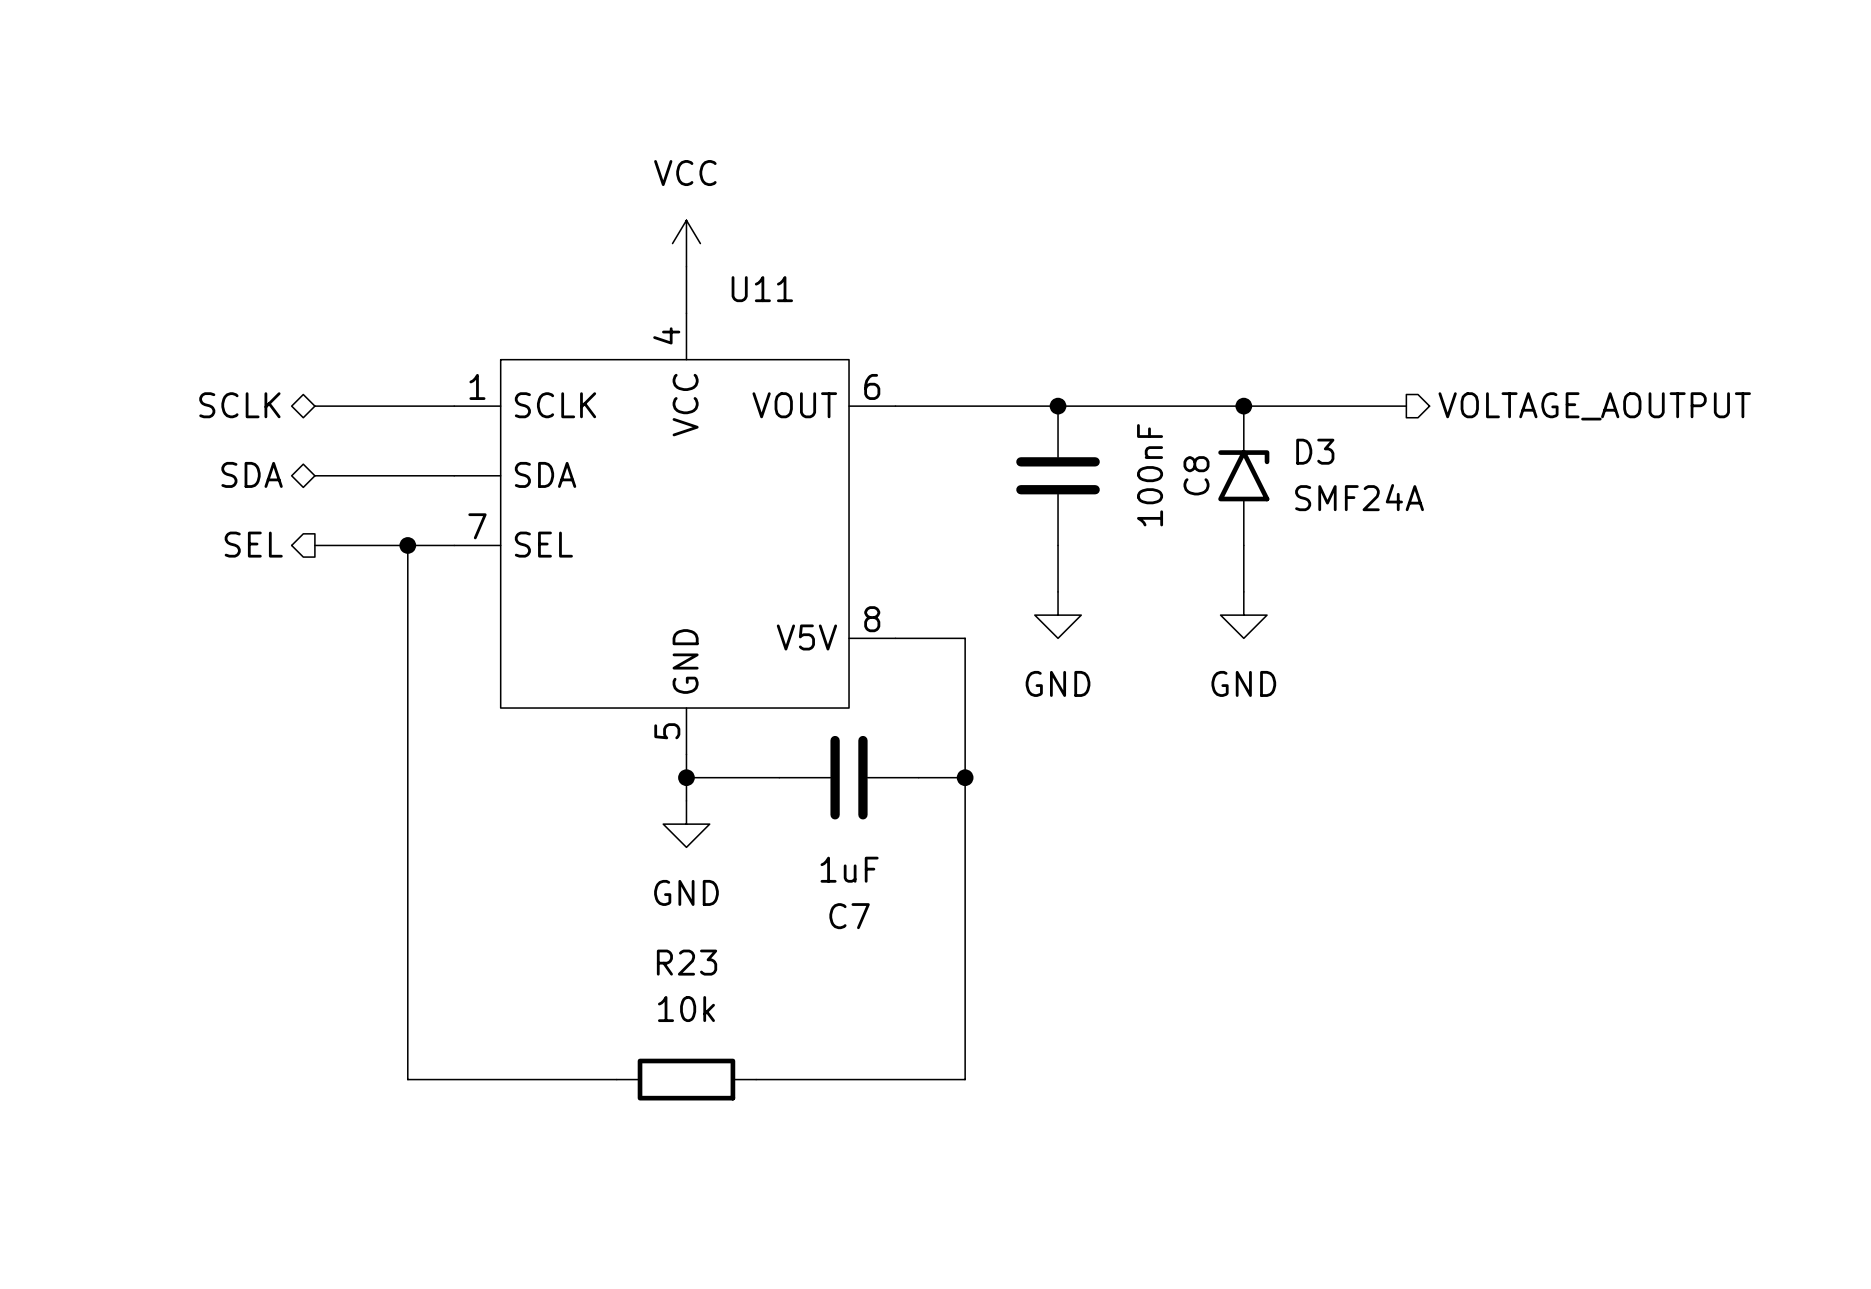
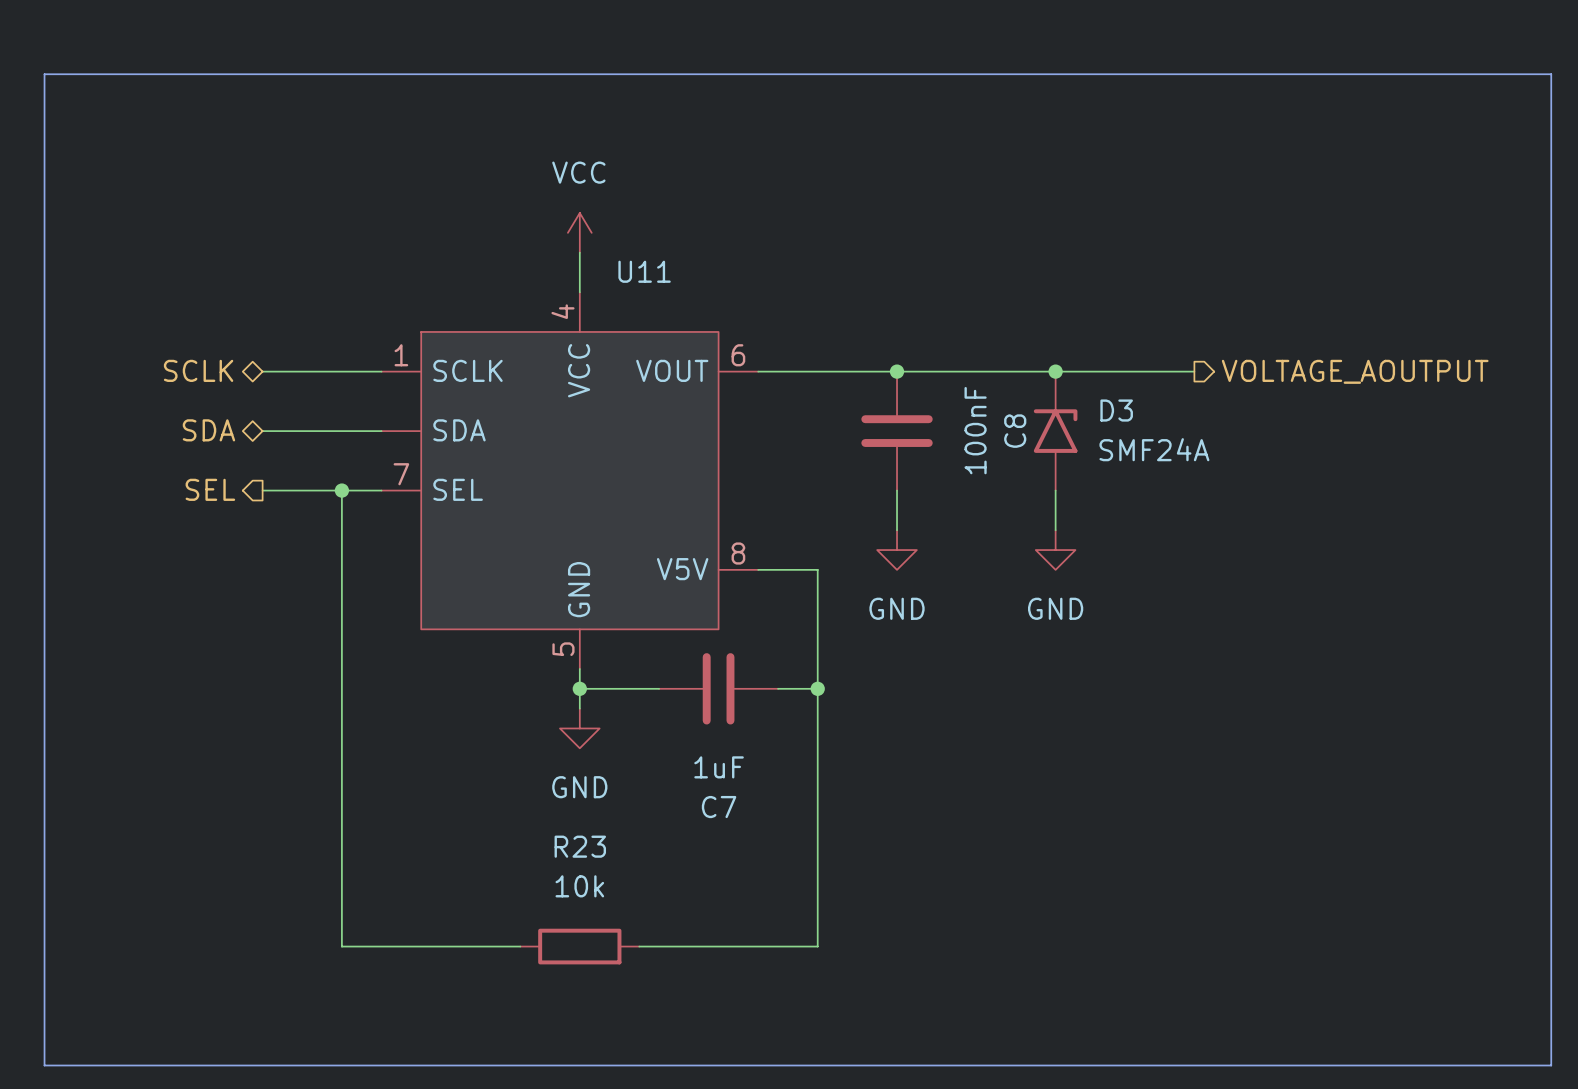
line: none -> (44, 74) (1551, 74) (1551, 1065) (44, 1065) (44, 74)

